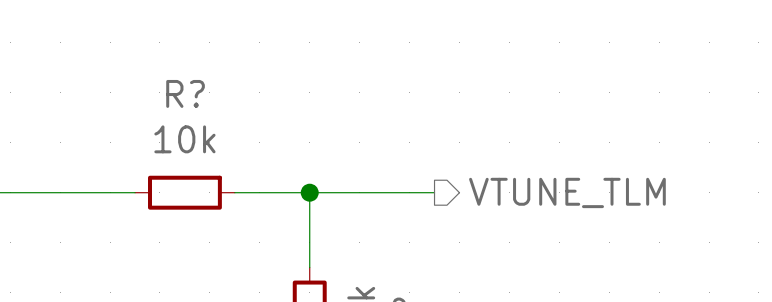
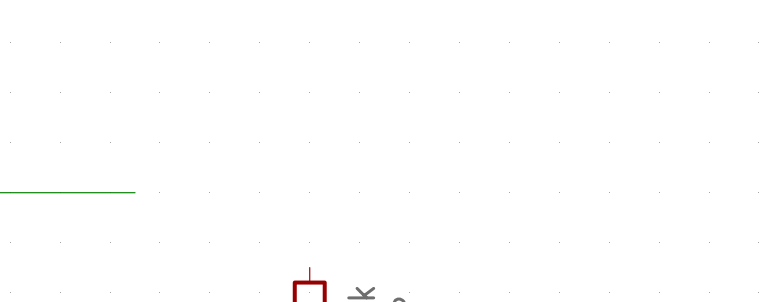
R?: 10k (184, 192) -> none
wire: (234, 192) (434, 192) -> none
wire: (309, 192) (309, 267) -> none
junction: (309, 192) -> none
hierarchical label: VTUNE_TLM (567, 192) -> none

